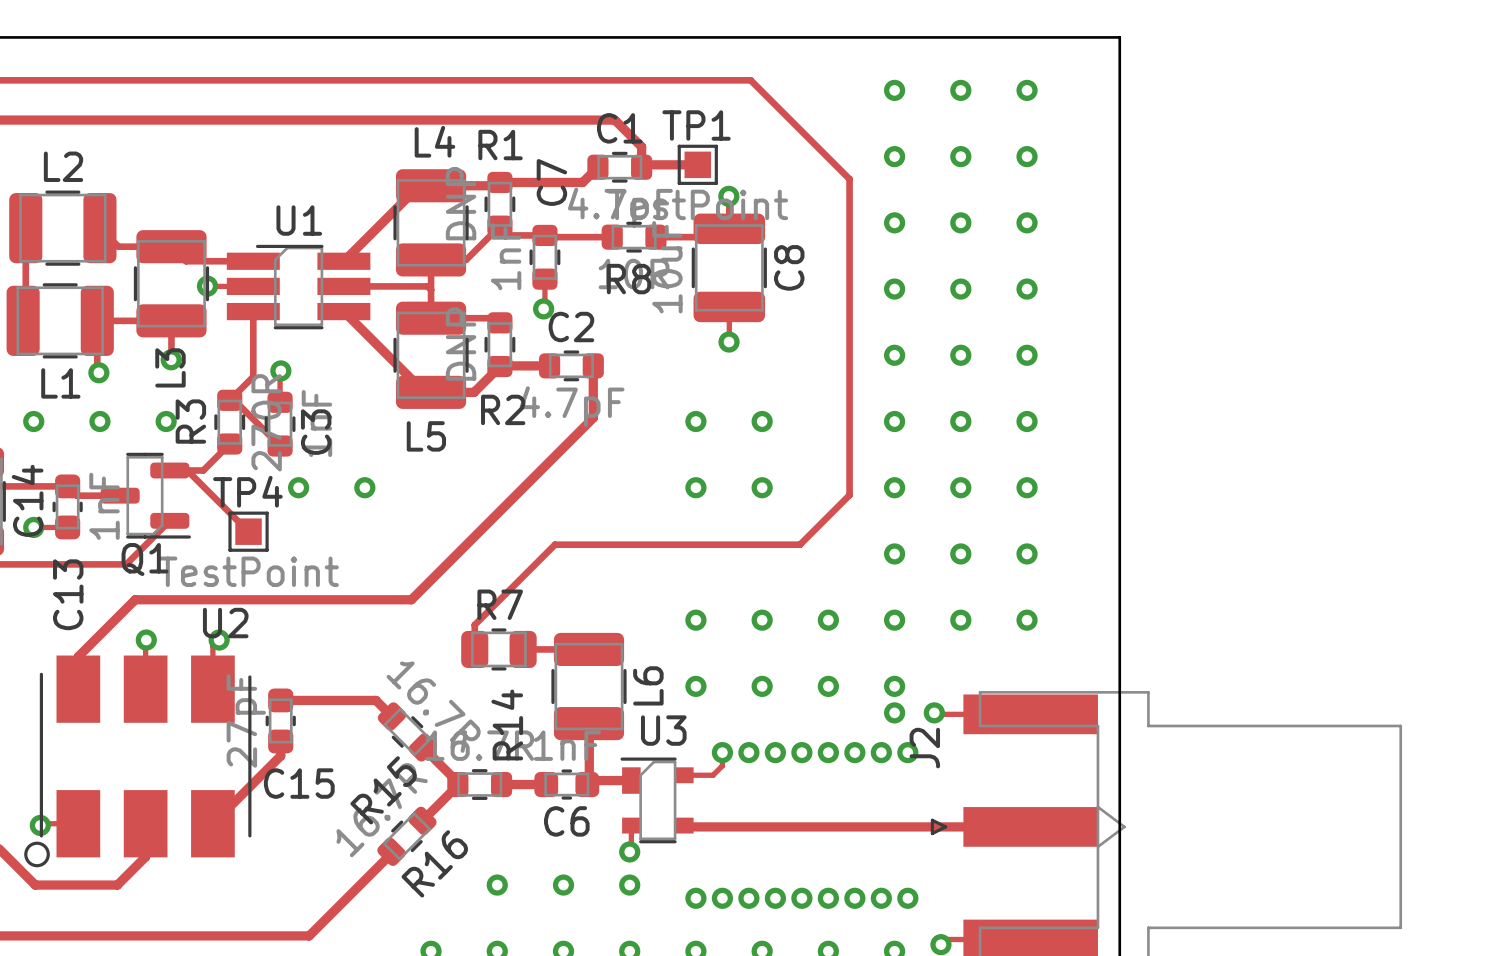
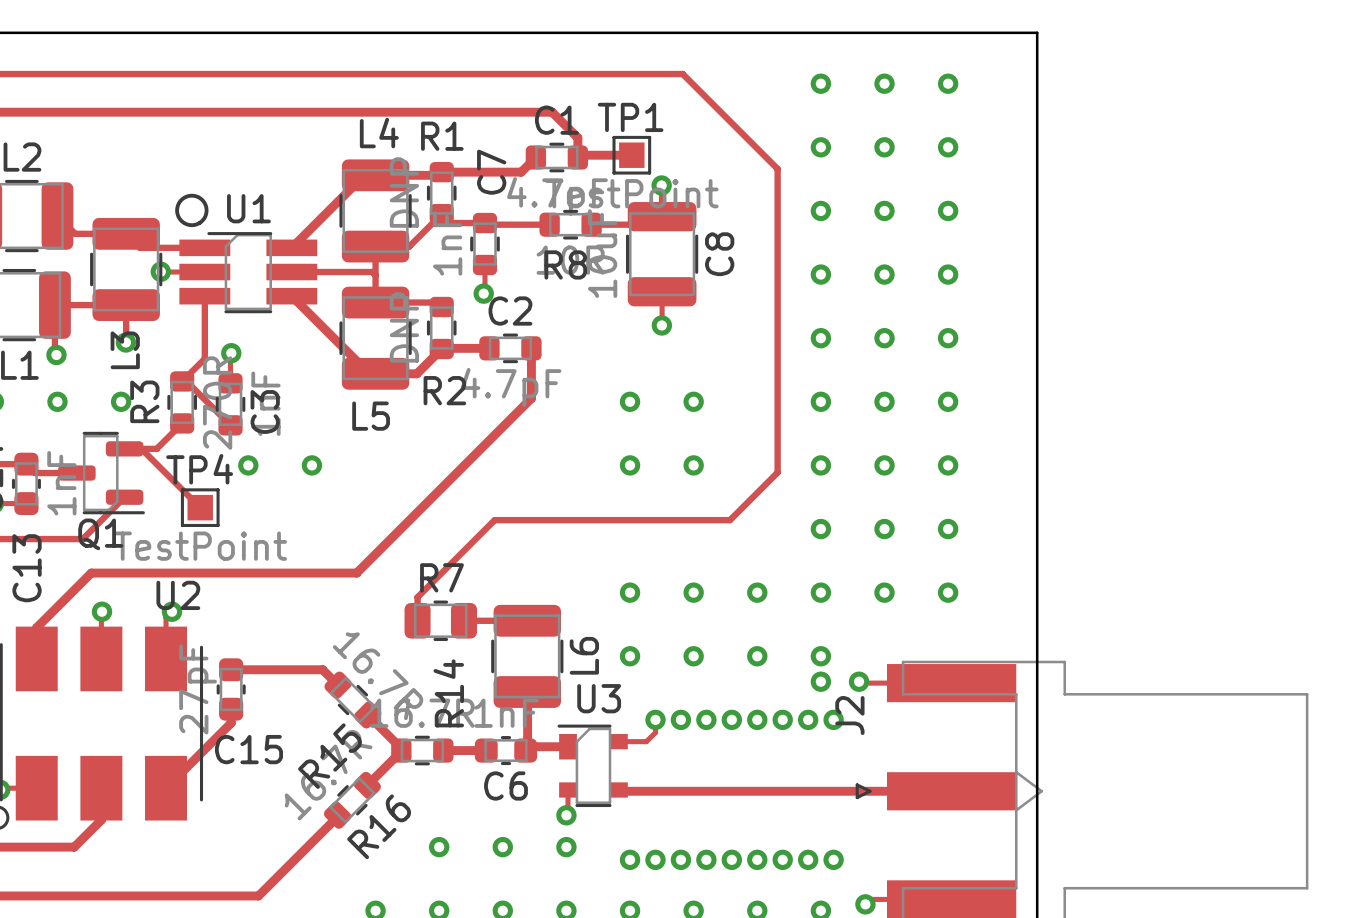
line: none -> (199, 222) (188, 224) (179, 218) (177, 207) (183, 198) (194, 196) (204, 202) (206, 213) (199, 222)

